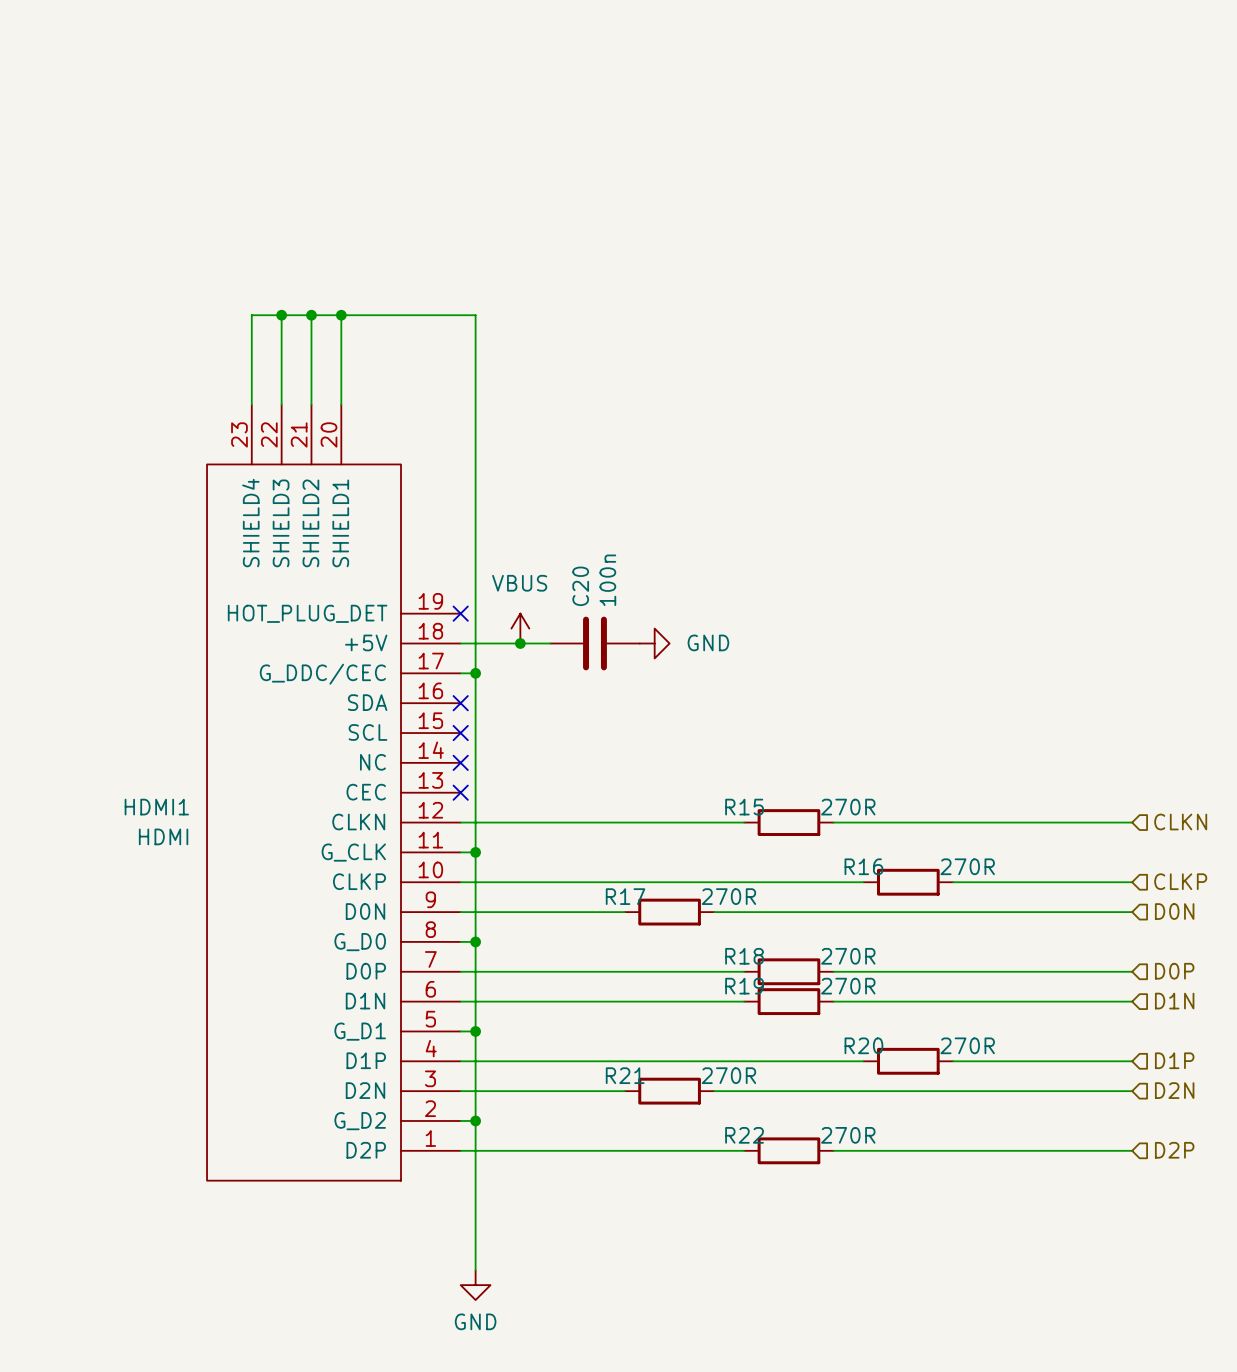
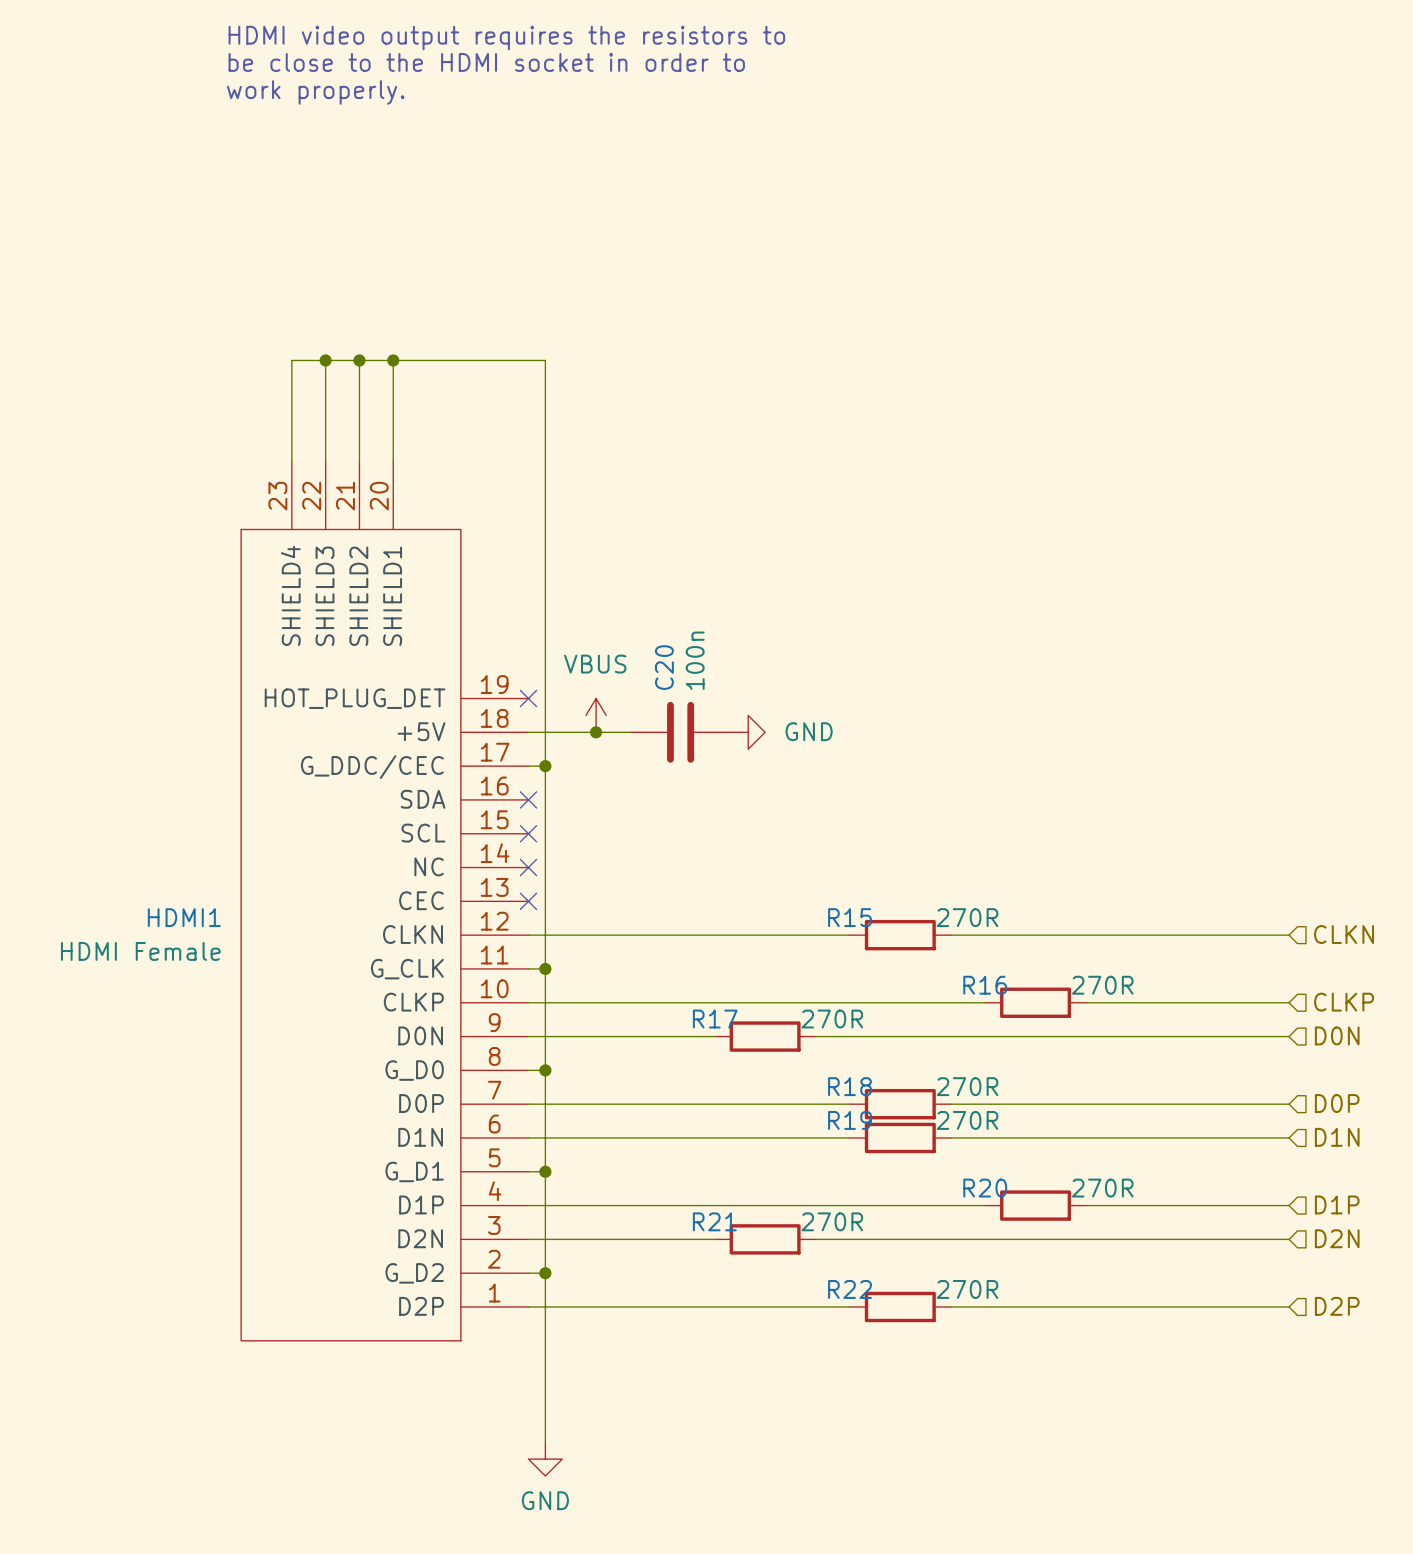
text: none -> HDMI video output requires the resistors to (506, 38)
text: none -> be close to the HDMI socket in order to (486, 62)
text: none -> work properly. (315, 92)
HDMI1 value: HDMI (163, 836) -> HDMI Female (140, 951)

